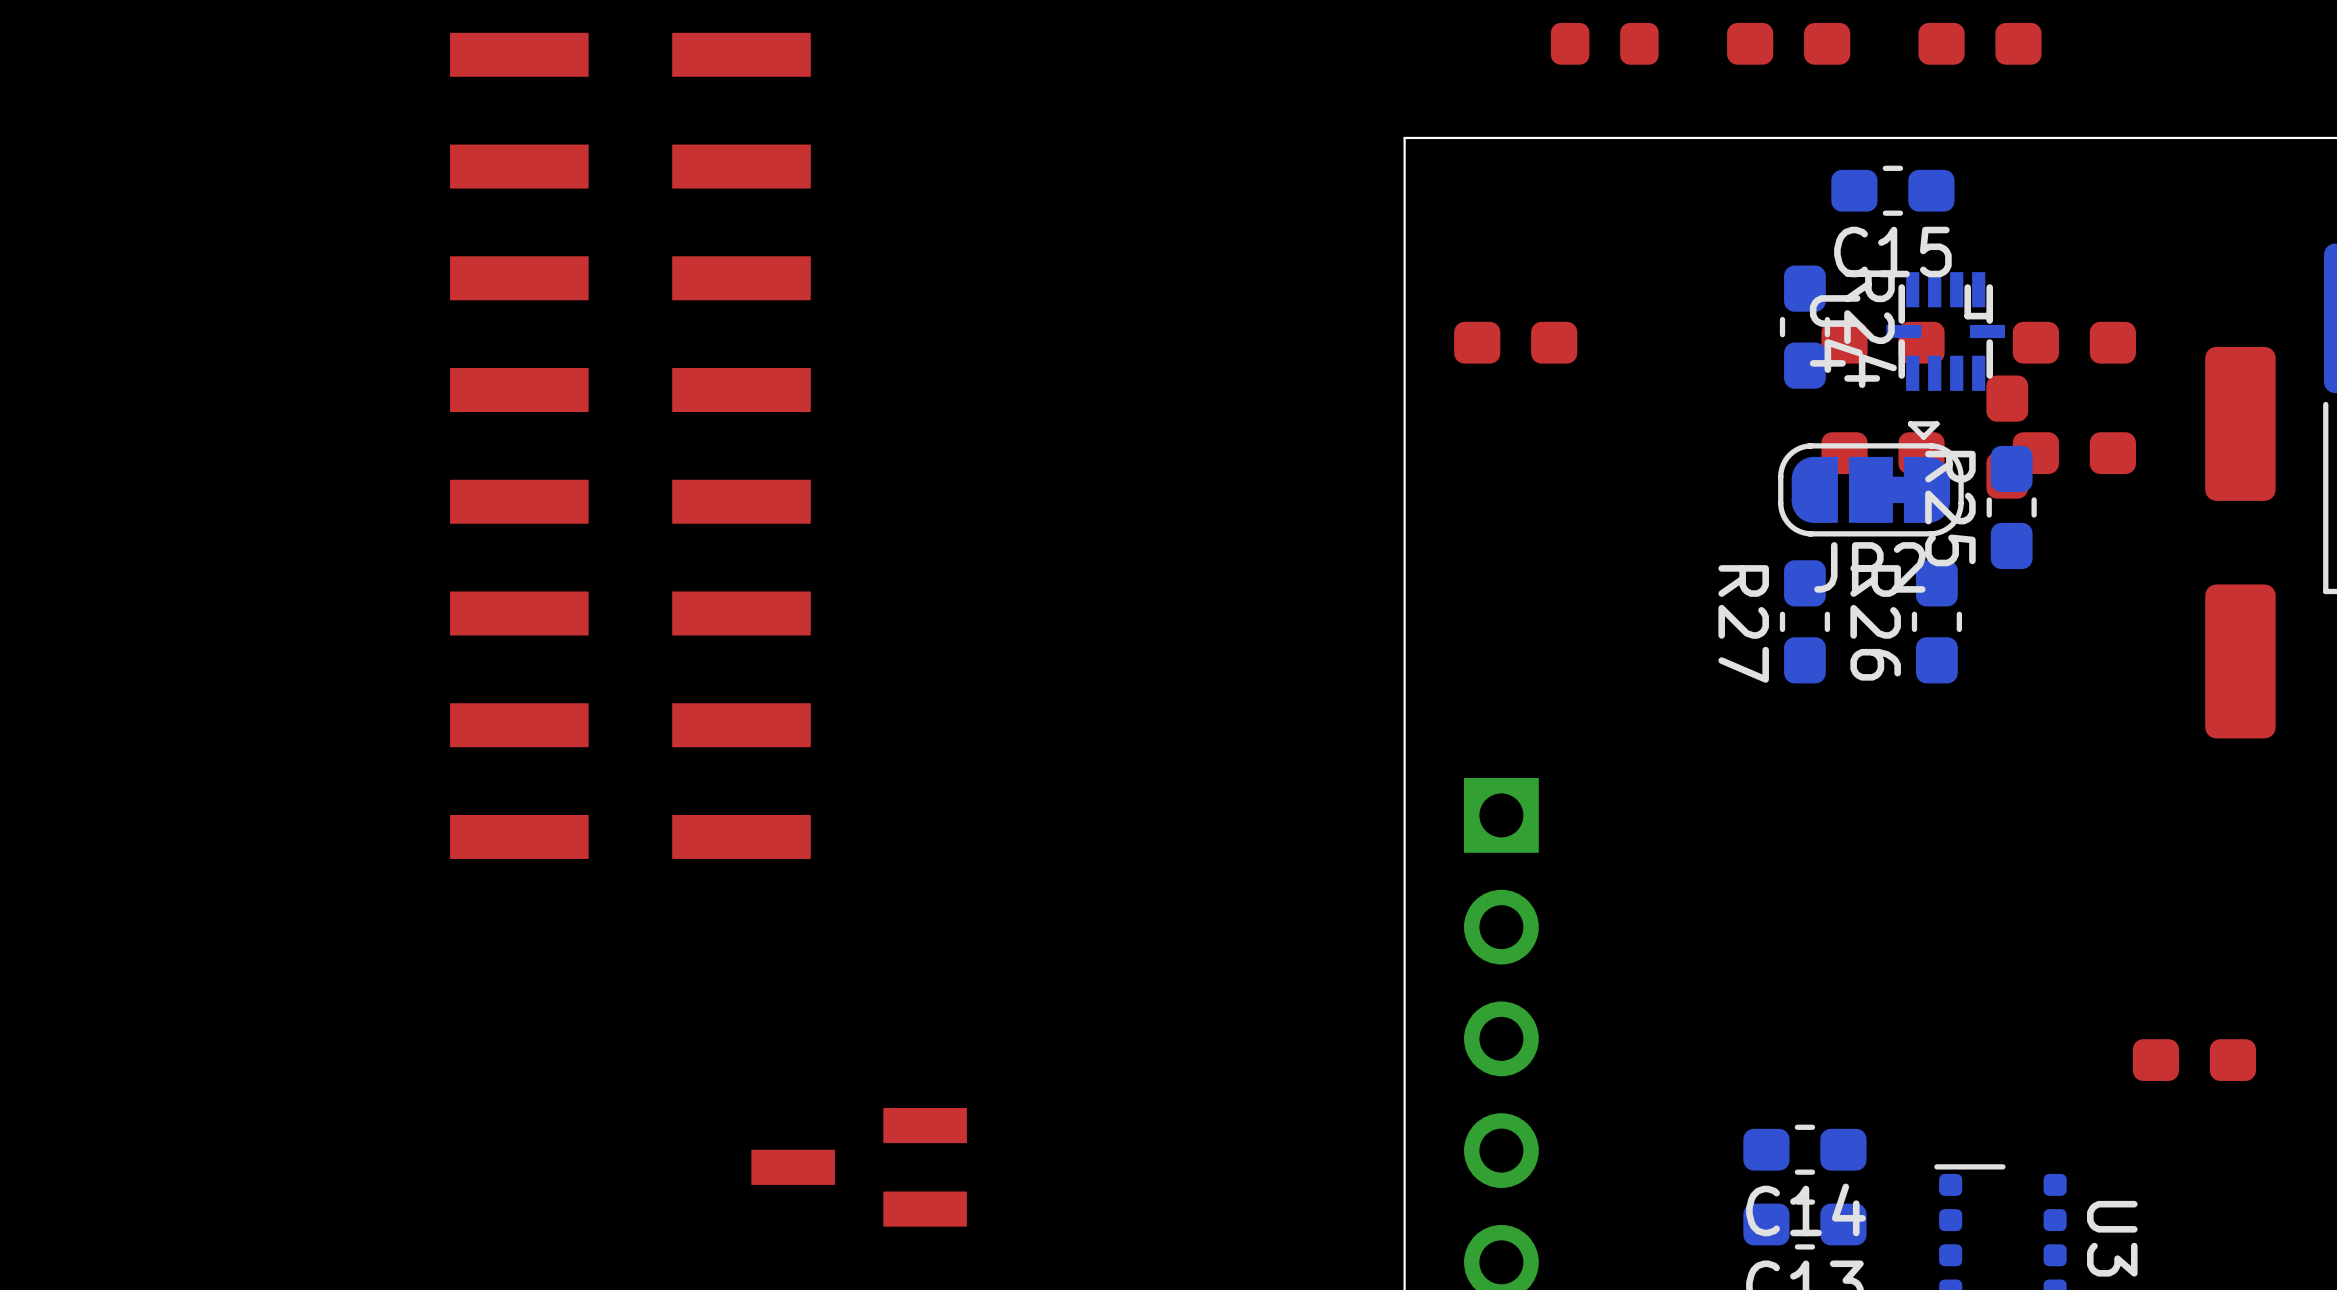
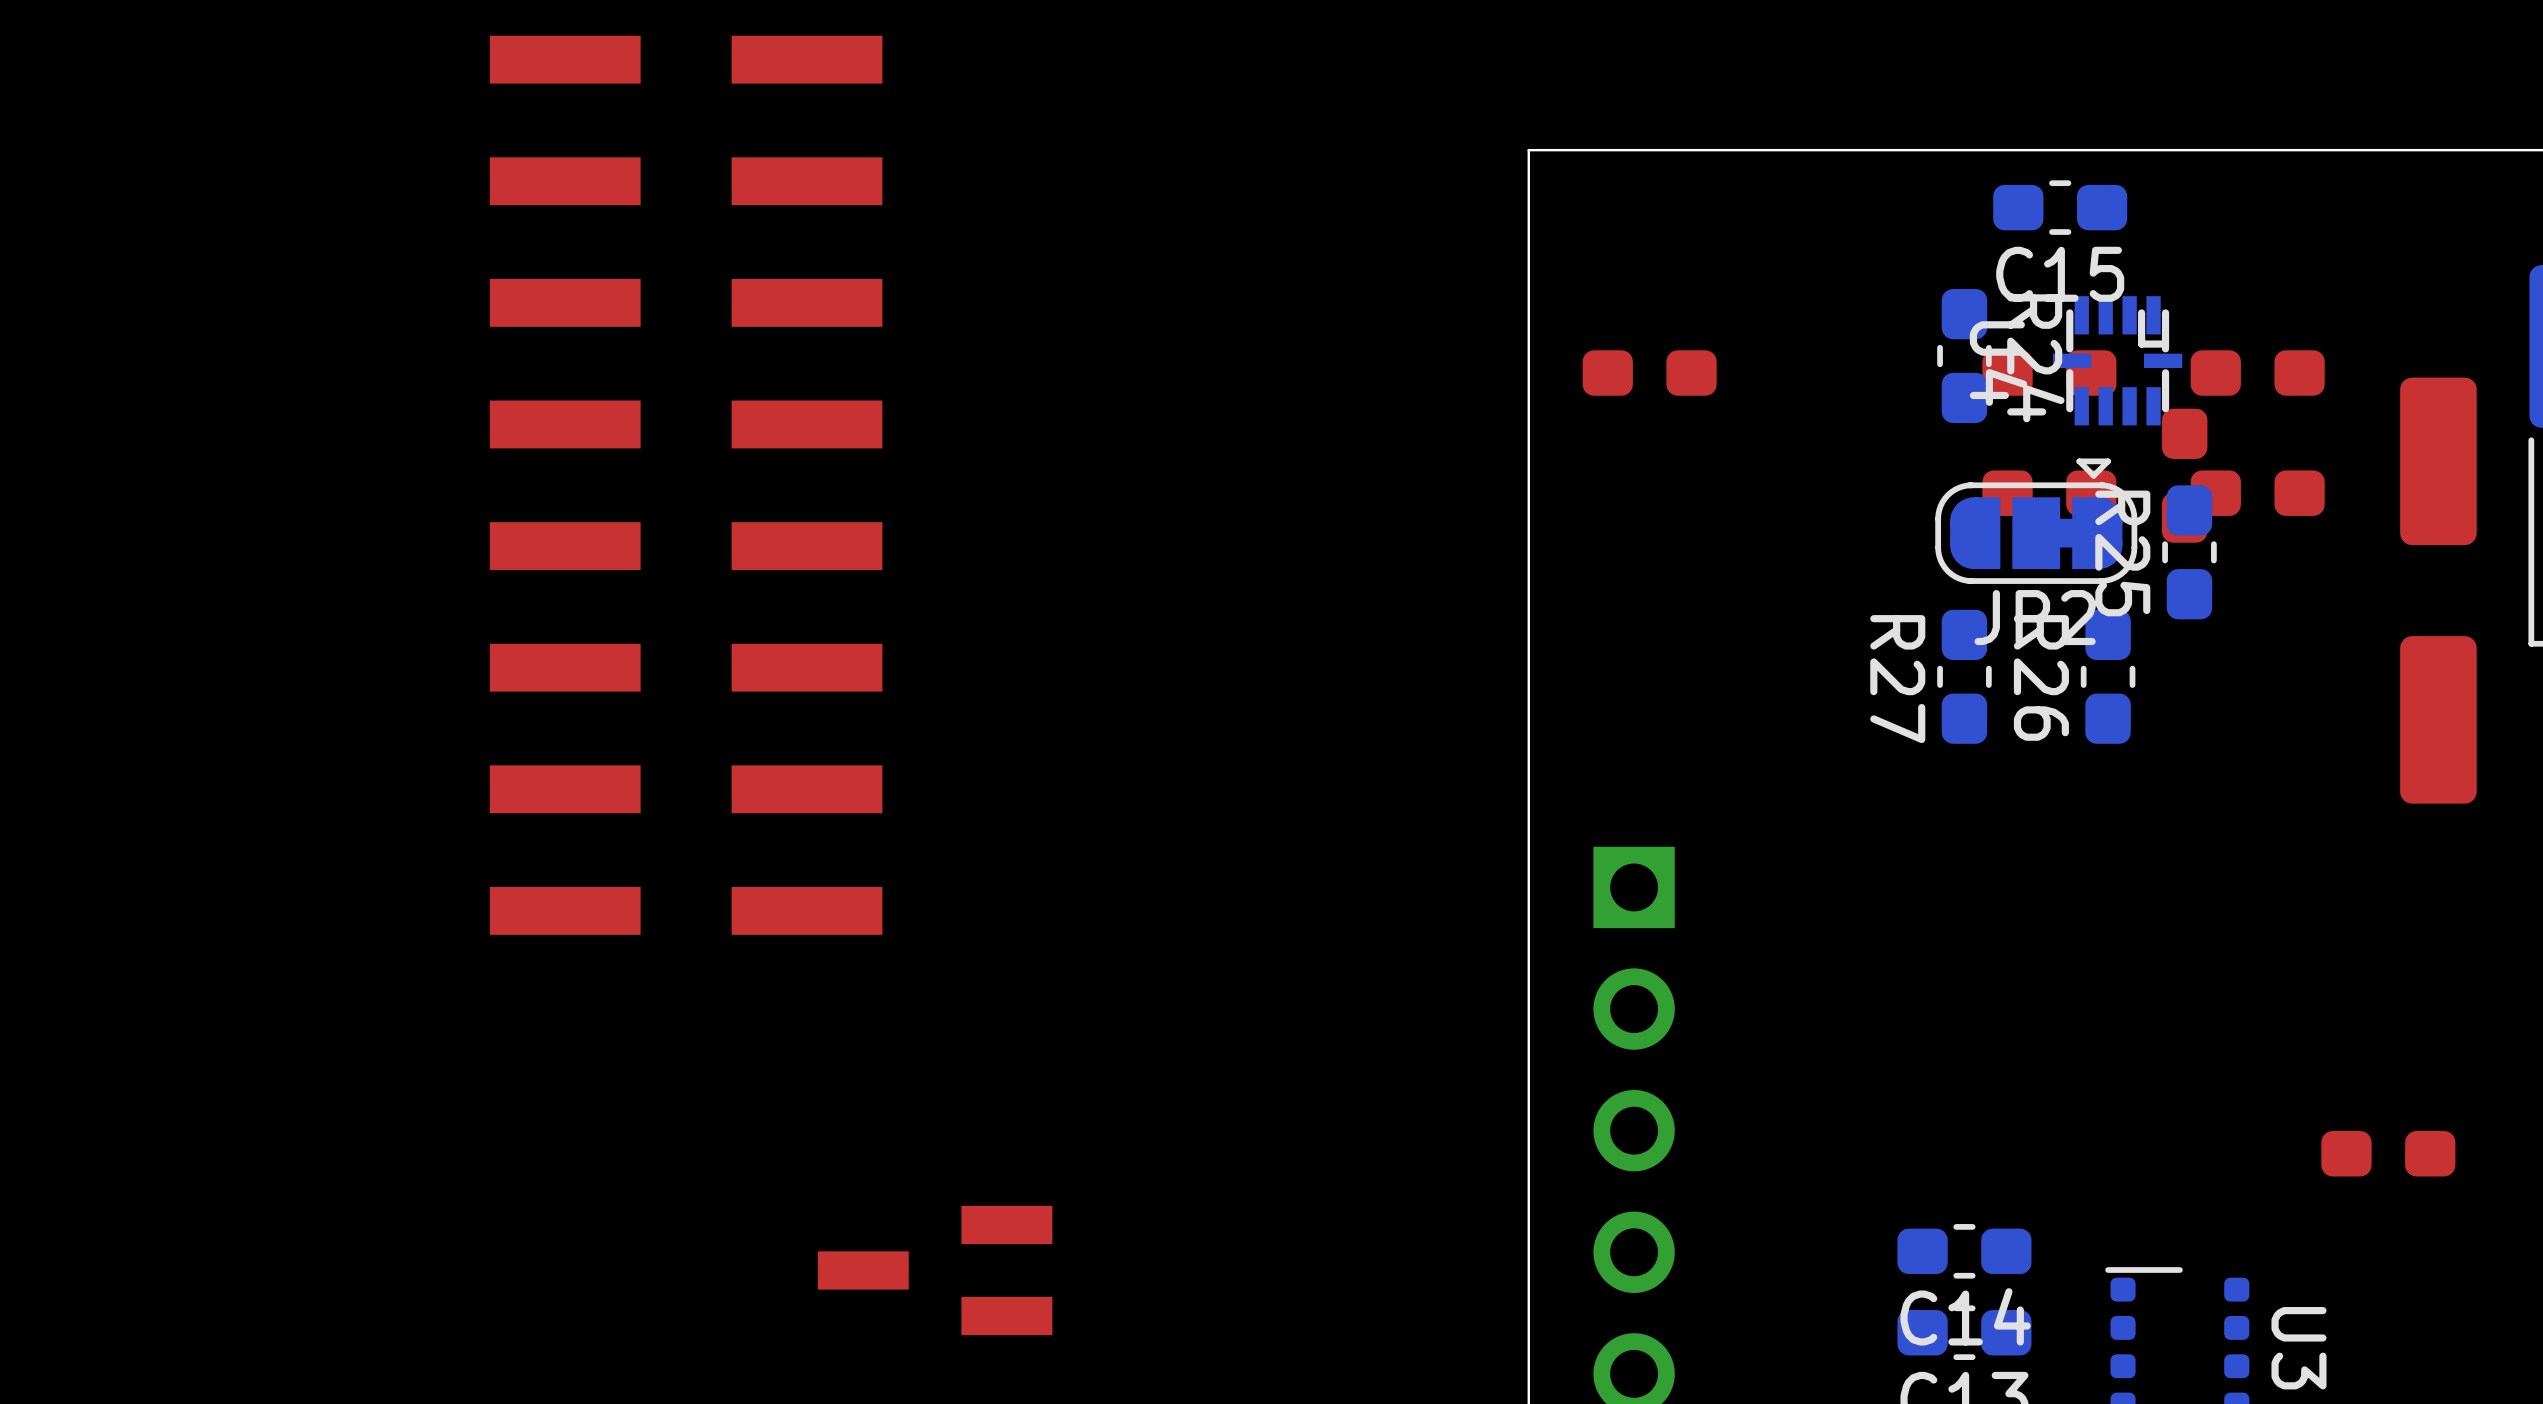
part: (1604, 43) -> none
part: (1788, 43) -> none
part: (1980, 43) -> none

